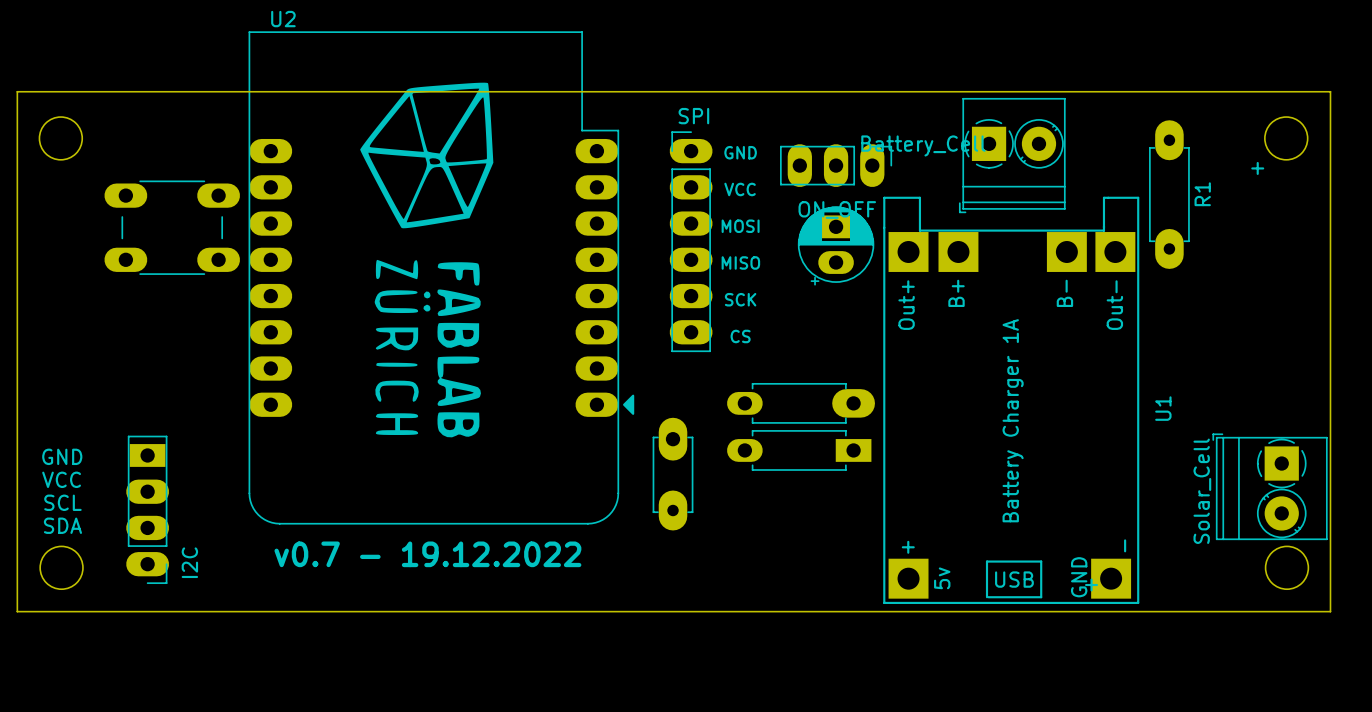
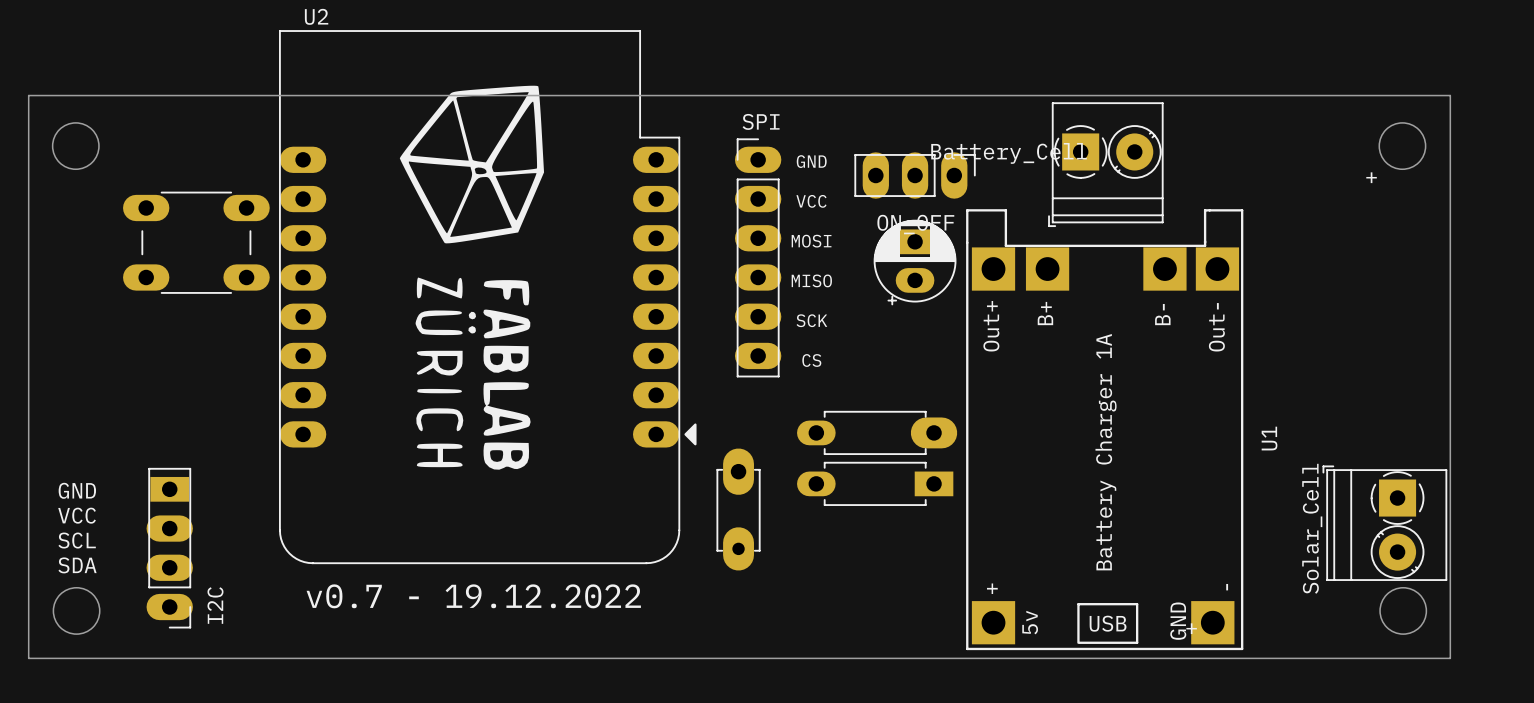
R1: (1169, 194) -> none

